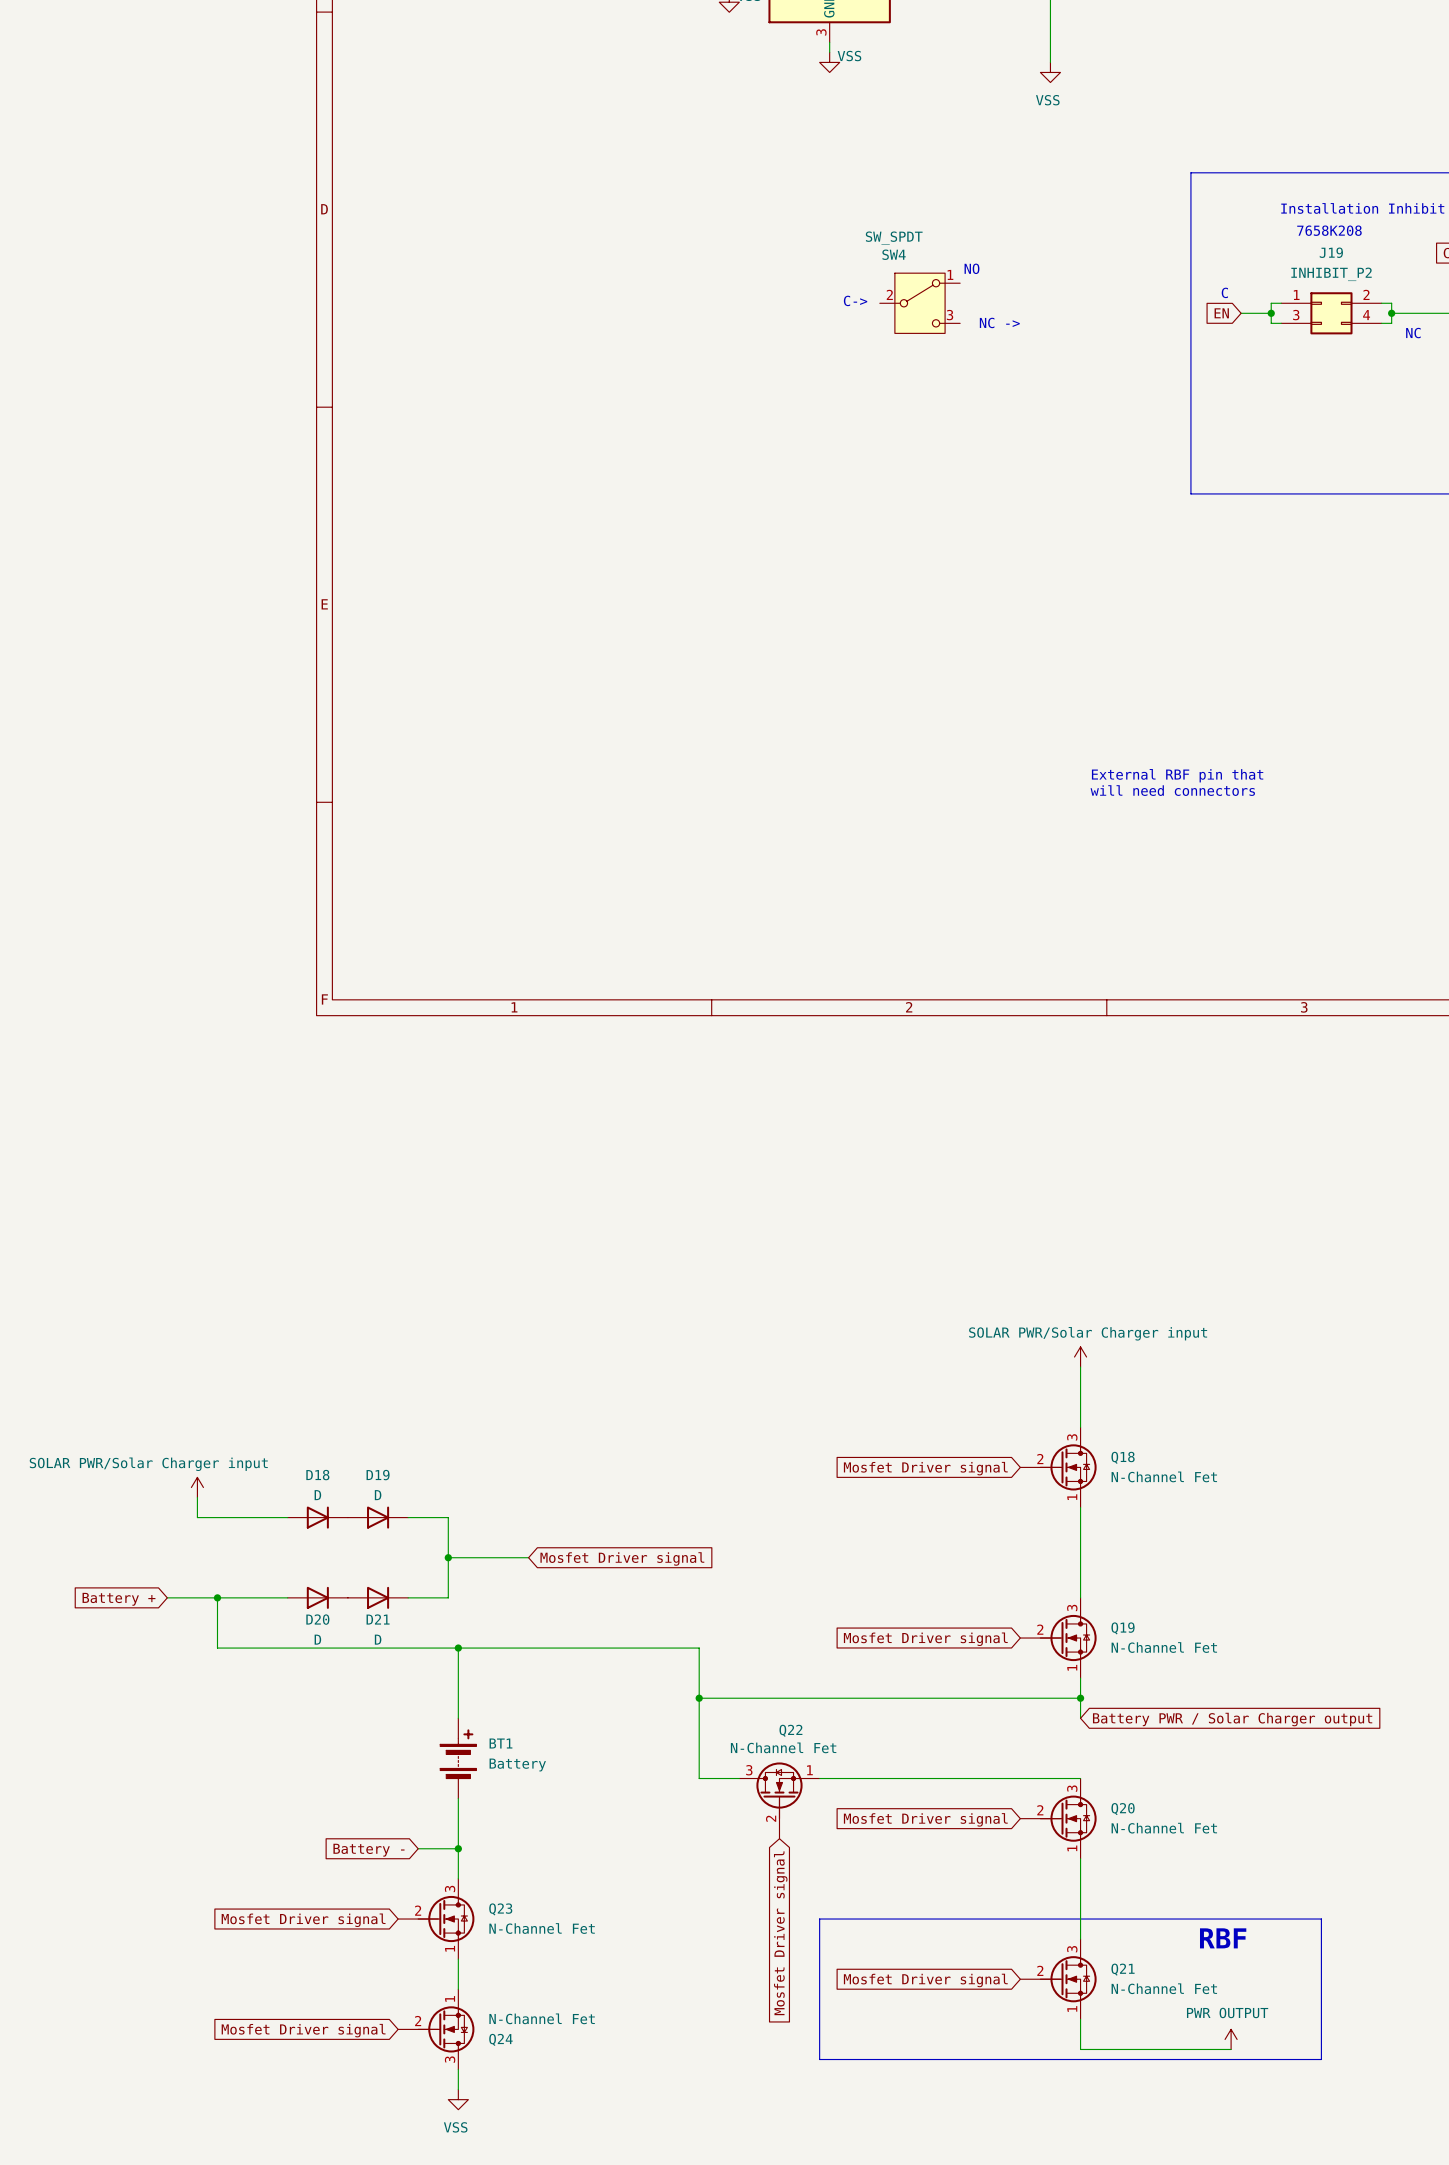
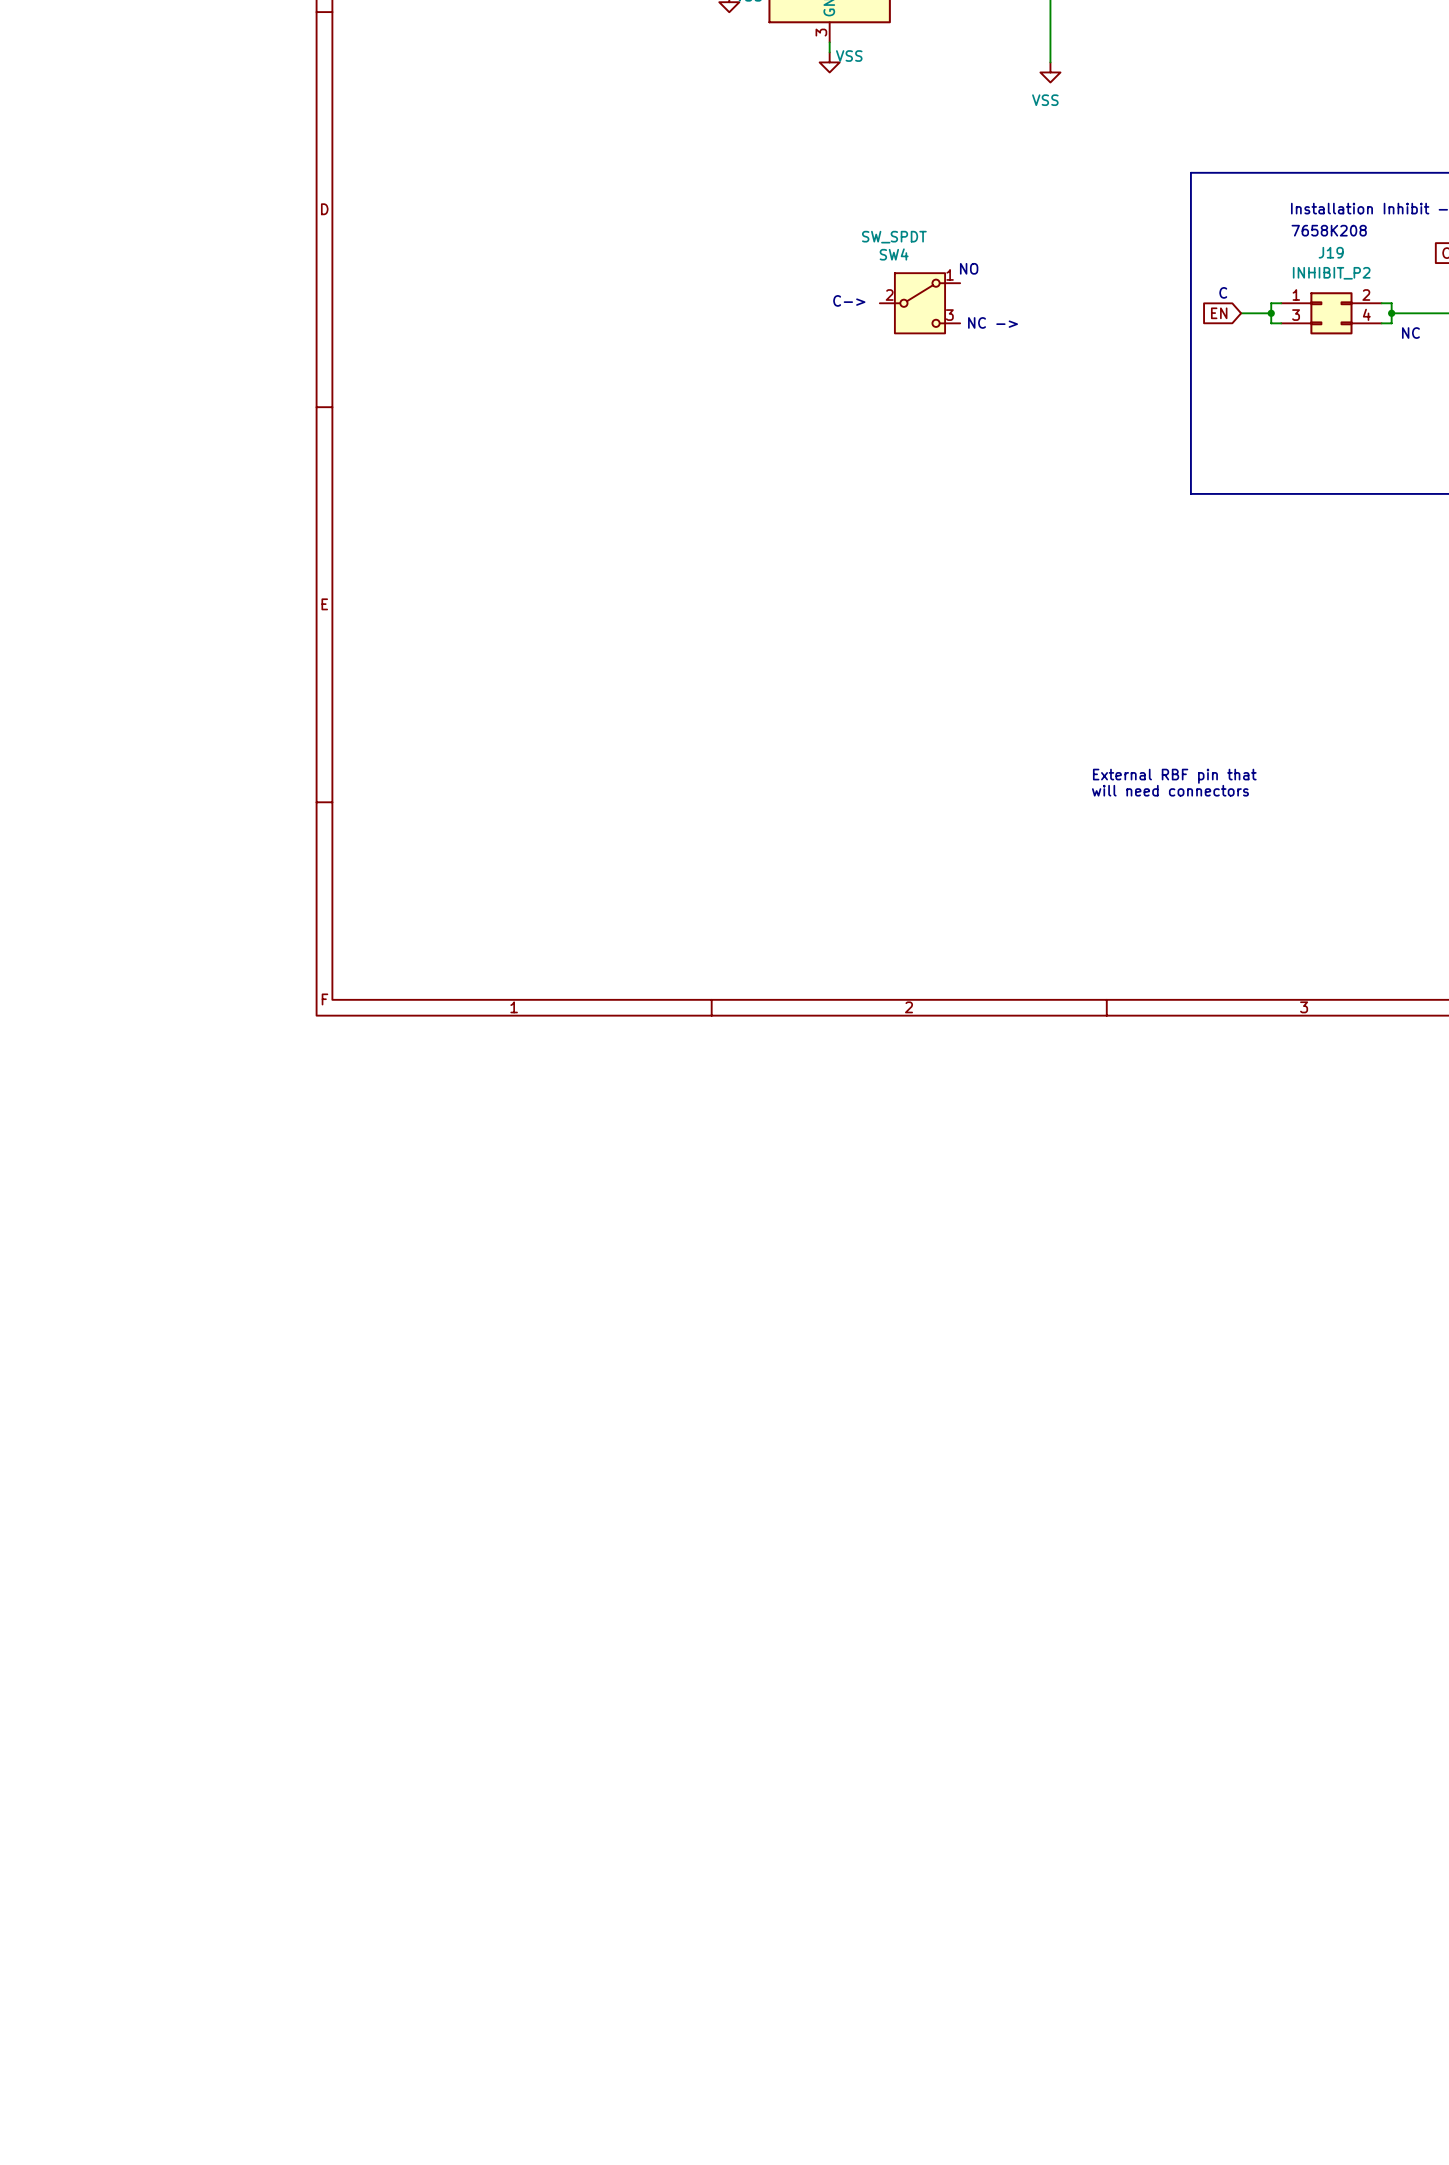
power symbol: SOLAR PWR/Solar Charger input (1080, 1357) -> none
wire: (1080, 1367) (1080, 1427) -> none
Q18: N-Channel Fet (1058, 1467) -> none
global label: Mosfet Driver signal (925, 1468) -> none
power symbol: SOLAR PWR/Solar Charger input (197, 1487) -> none
wire: (197, 1497) (197, 1517) (287, 1517) -> none
wire: (1080, 1507) (1080, 1597) -> none
D18: D (317, 1517) -> none
D19: D (378, 1517) -> none
wire: (408, 1517) (448, 1517) (448, 1597) (408, 1597) -> none
wire: (448, 1557) (528, 1557) -> none
junction: (448, 1557) -> none
global label: Mosfet Driver signal (622, 1558) -> none
wire: (167, 1597) (287, 1597) -> none
wire: (217, 1597) (217, 1648) (699, 1648) (699, 1778) (739, 1778) -> none
junction: (217, 1597) -> none
D20: D (317, 1597) -> none
D21: D (378, 1597) -> none
global label: Battery + (118, 1599) -> none
Q19: N-Channel Fet (1058, 1638) -> none
global label: Mosfet Driver signal (925, 1639) -> none
wire: (458, 1648) (458, 1718) -> none
junction: (458, 1648) -> none
wire: (1080, 1678) (1080, 1718) -> none
wire: (699, 1698) (1080, 1698) -> none
junction: (699, 1698) -> none
junction: (1080, 1698) -> none
global label: Battery PWR / Solar Charger output (1232, 1719) -> none
BT1: Battery (458, 1758) -> none
wire: (819, 1778) (1080, 1778) -> none
wire: (458, 1798) (458, 1878) -> none
Q22: N-Channel Fet (779, 1800) -> none
Q20: N-Channel Fet (1058, 1818) -> none
global label: Mosfet Driver signal (925, 1819) -> none
wire: (418, 1848) (458, 1848) -> none
junction: (458, 1848) -> none
global label: Battery - (368, 1850) -> none
wire: (1080, 1858) (1080, 1939) -> none
Q23: N-Channel Fet (436, 1919) -> none
line: (819, 1919) (1321, 1919) (1321, 2059) (819, 2059) (819, 1919) -> none
global label: Mosfet Driver signal (303, 1920) -> none
global label: Mosfet Driver signal (780, 1933) -> none
text: RBF (1223, 1938) -> none
wire: (458, 1959) (458, 1989) -> none
Q21: N-Channel Fet (1058, 1979) -> none
global label: Mosfet Driver signal (925, 1980) -> none
wire: (1080, 2019) (1080, 2049) (1231, 2049) -> none
Q24: N-Channel Fet (436, 2029) -> none
global label: Mosfet Driver signal (303, 2030) -> none
power symbol: PWR OUTPUT (1231, 2039) -> none
wire: (458, 2069) (458, 2089) -> none
power symbol: VSS (458, 2099) -> none

